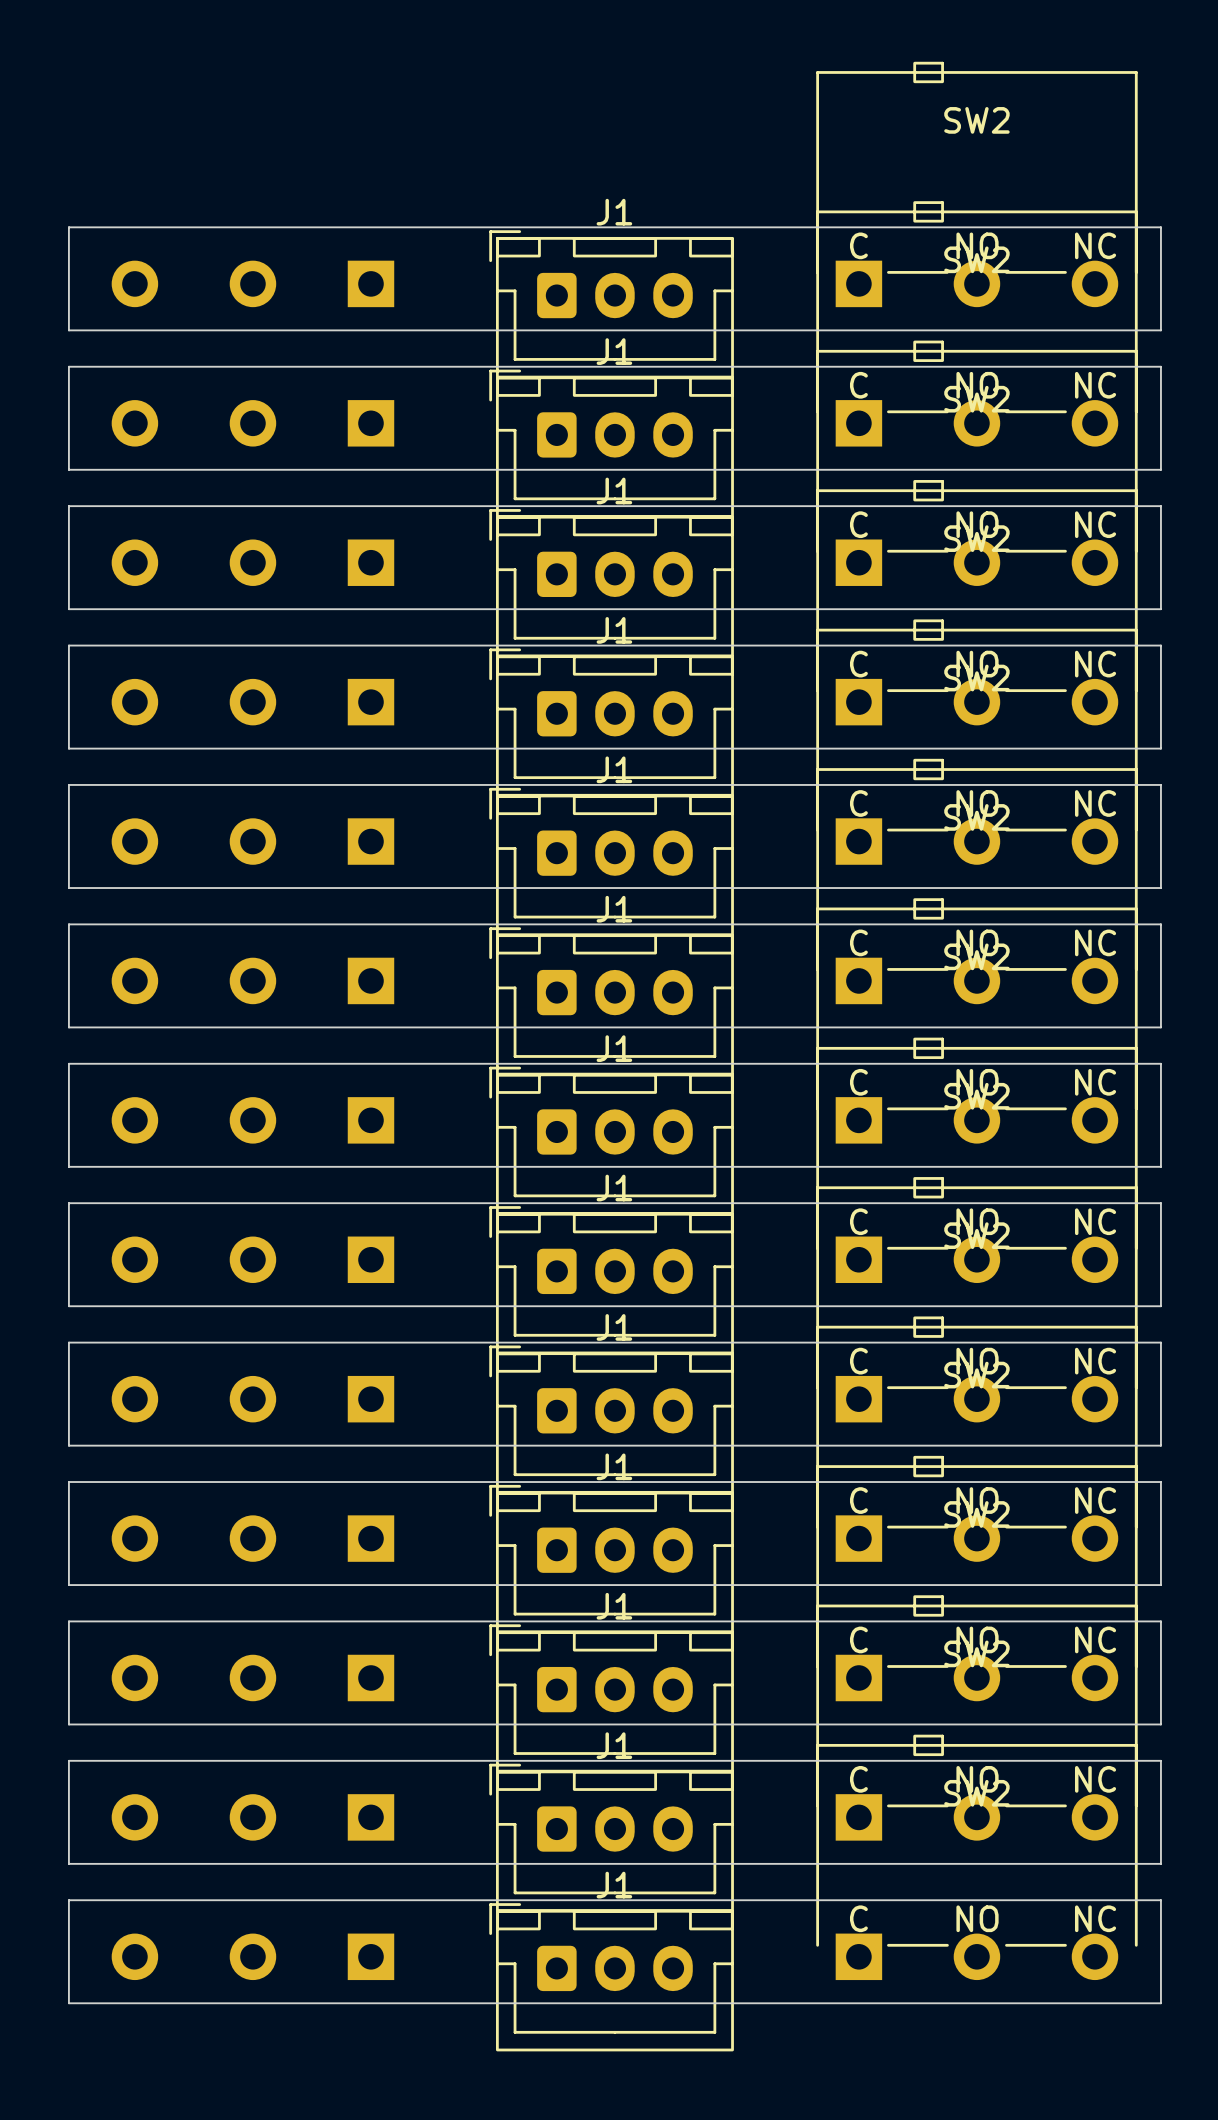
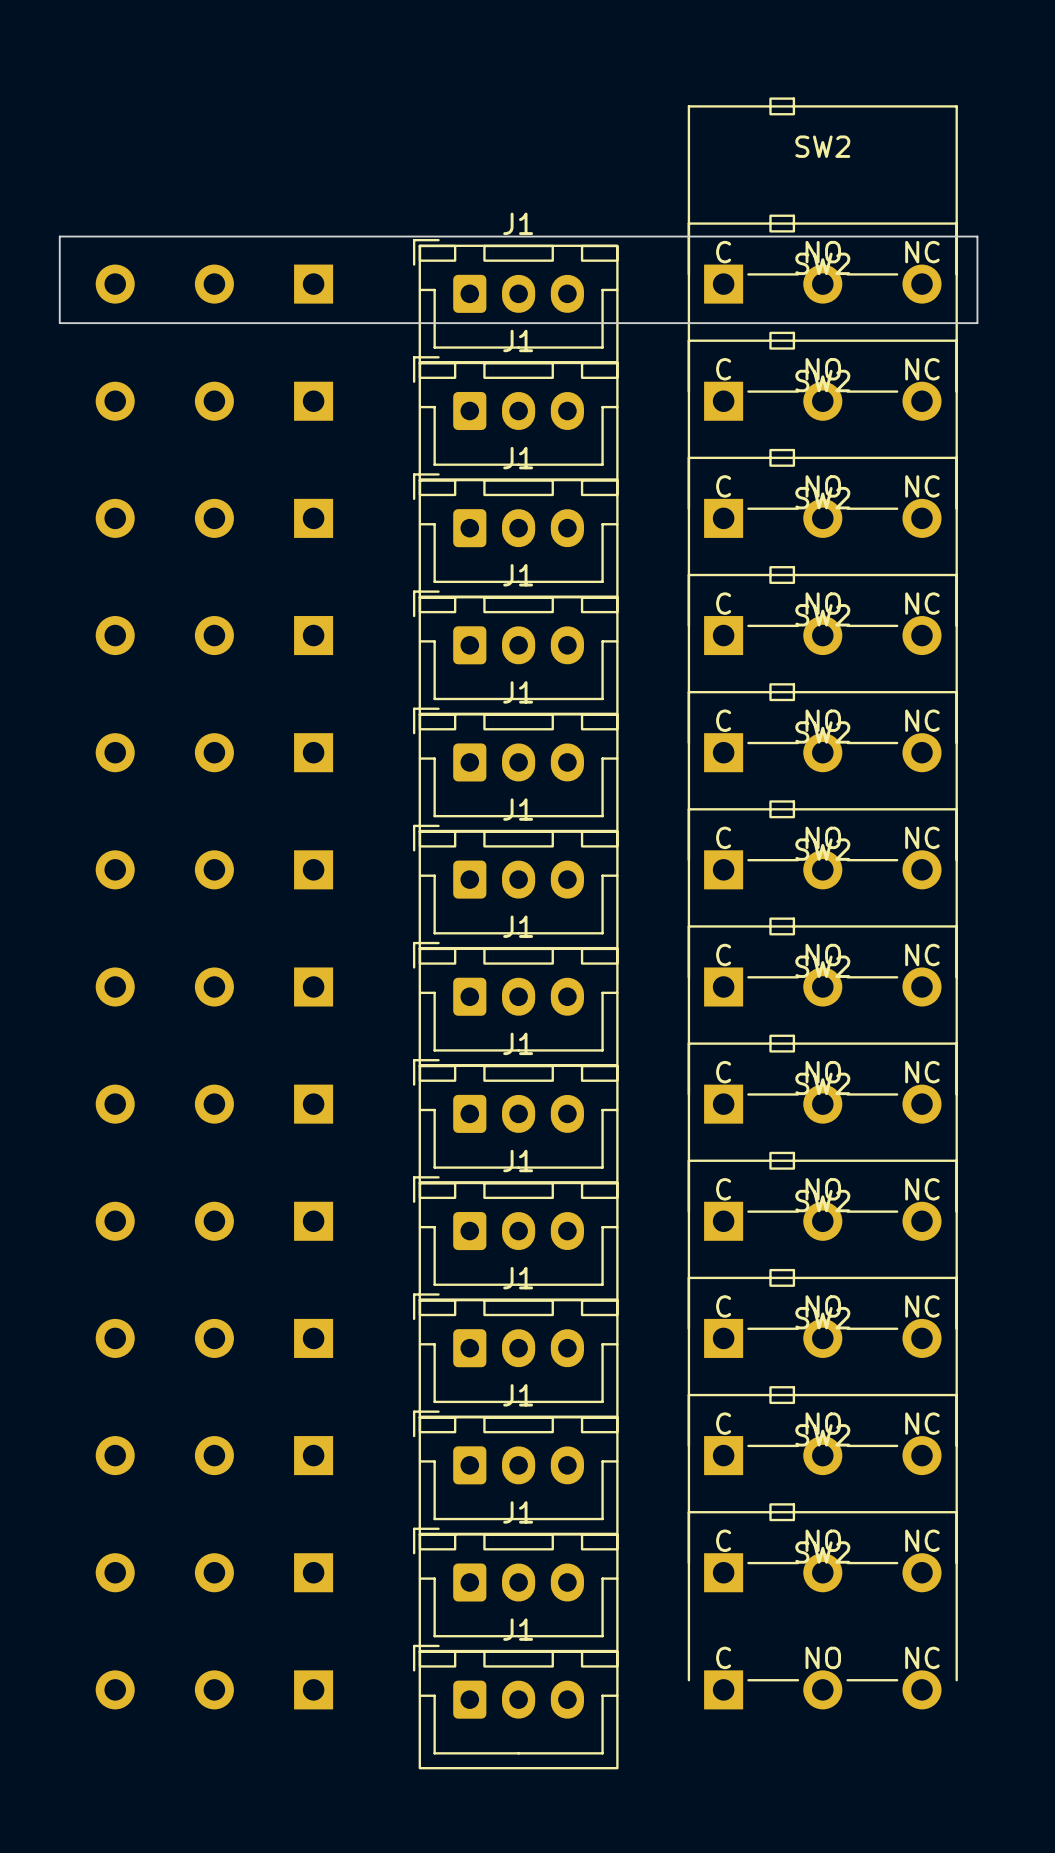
board edge: (68, 366) (1160, 366) (1160, 469) (68, 469) (68, 366) -> none
board edge: (68, 506) (68, 609) (1160, 609) (1160, 506) (68, 506) -> none
board edge: (68, 645) (68, 748) (1160, 748) (1160, 645) (68, 645) -> none
board edge: (68, 784) (68, 888) (1160, 888) (1160, 784) (68, 784) -> none
board edge: (68, 924) (68, 1027) (1160, 1027) (1160, 924) (68, 924) -> none
board edge: (68, 1063) (68, 1166) (1160, 1166) (1160, 1063) (68, 1063) -> none
board edge: (68, 1203) (68, 1306) (1160, 1306) (1160, 1203) (68, 1203) -> none
board edge: (68, 1342) (68, 1445) (1160, 1445) (1160, 1342) (68, 1342) -> none
board edge: (68, 1482) (68, 1585) (1160, 1585) (1160, 1482) (68, 1482) -> none
board edge: (68, 1621) (68, 1724) (1160, 1724) (1160, 1621) (68, 1621) -> none
board edge: (68, 1760) (68, 1863) (1160, 1863) (1160, 1760) (68, 1760) -> none
board edge: (68, 1900) (68, 2003) (1160, 2003) (1160, 1900) (68, 1900) -> none

